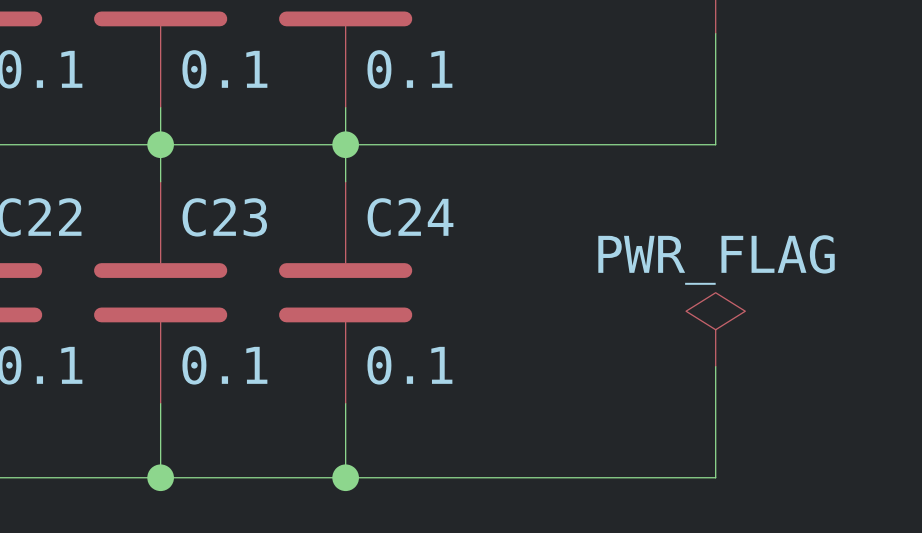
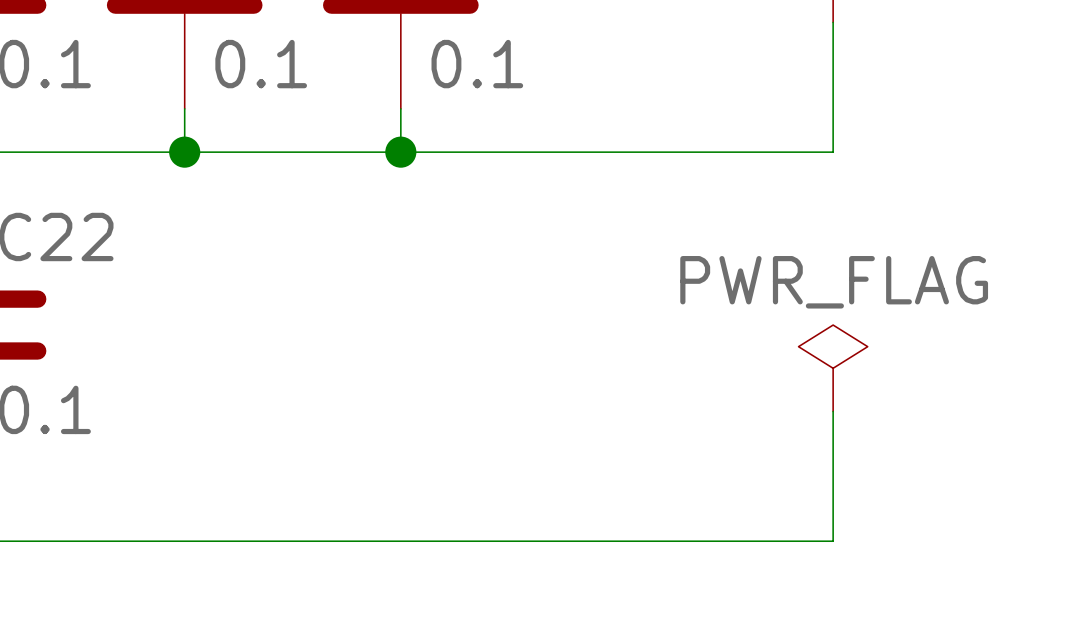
wire: (160, 144) (160, 181) -> none
wire: (345, 144) (345, 181) -> none
C23: 0.1 (160, 292) -> none
C24: 0.1 (345, 292) -> none
wire: (160, 403) (160, 477) -> none
wire: (345, 403) (345, 477) -> none
junction: (160, 477) -> none
junction: (345, 477) -> none

